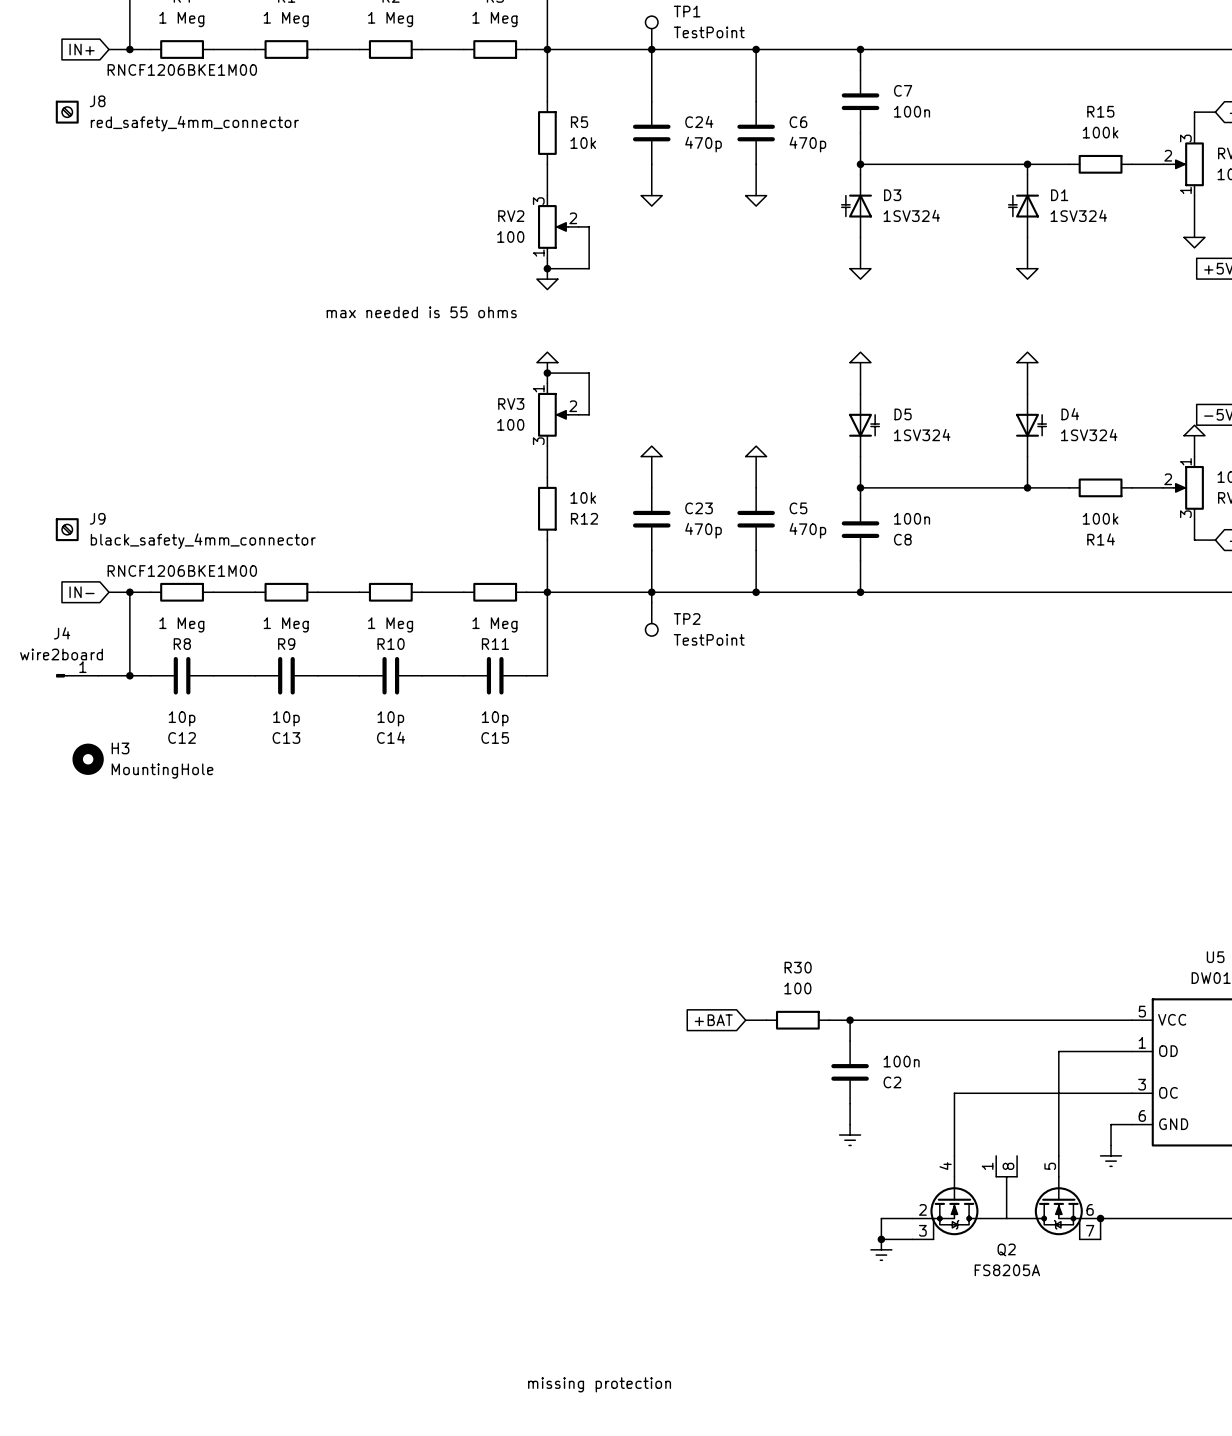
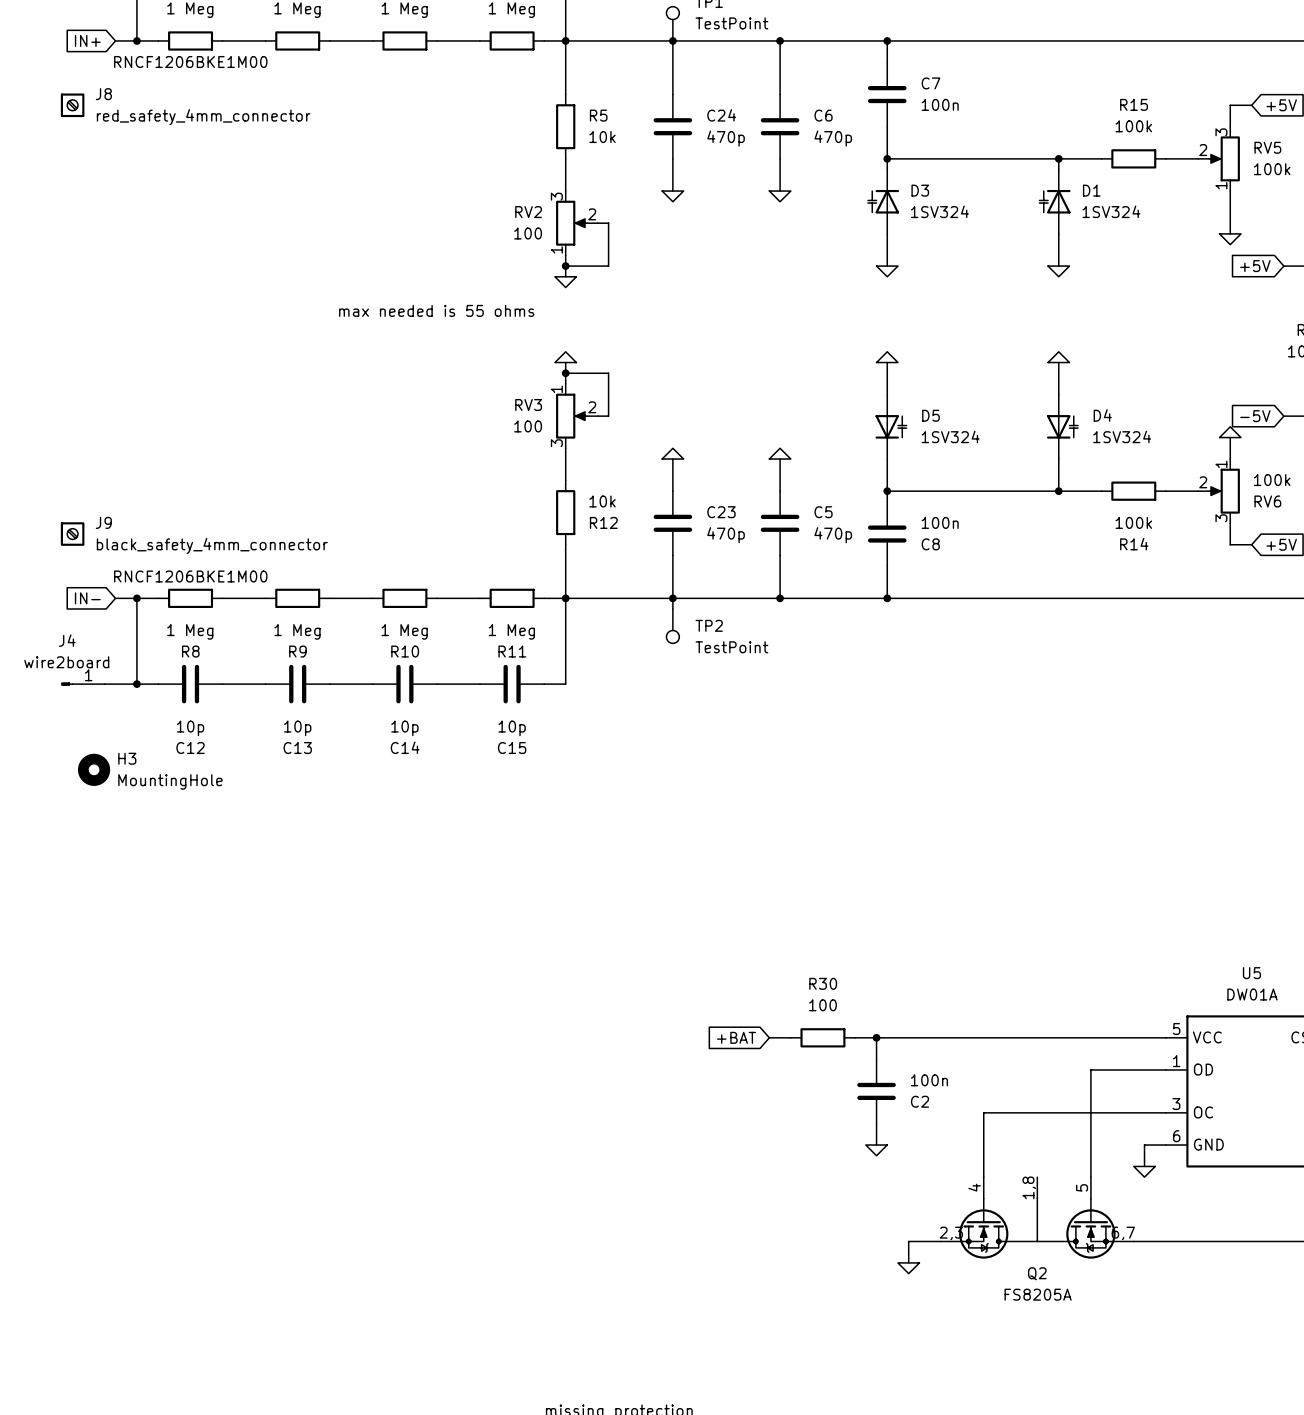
power symbol shape: [839, 1124, 861, 1146] -> [865, 1145, 888, 1156]
power symbol shape: [1100, 1145, 1122, 1167] -> [1133, 1166, 1156, 1178]
Q2 symbol: [912, 1155, 1101, 1240] -> [940, 1177, 1134, 1259]
wire: (1100, 1218) (1100, 1239) -> none
junction: (1100, 1218) -> none
power symbol shape: [870, 1239, 892, 1261] -> [897, 1262, 920, 1274]
wire: (881, 1239) (912, 1239) -> none
junction: (881, 1239) -> none

